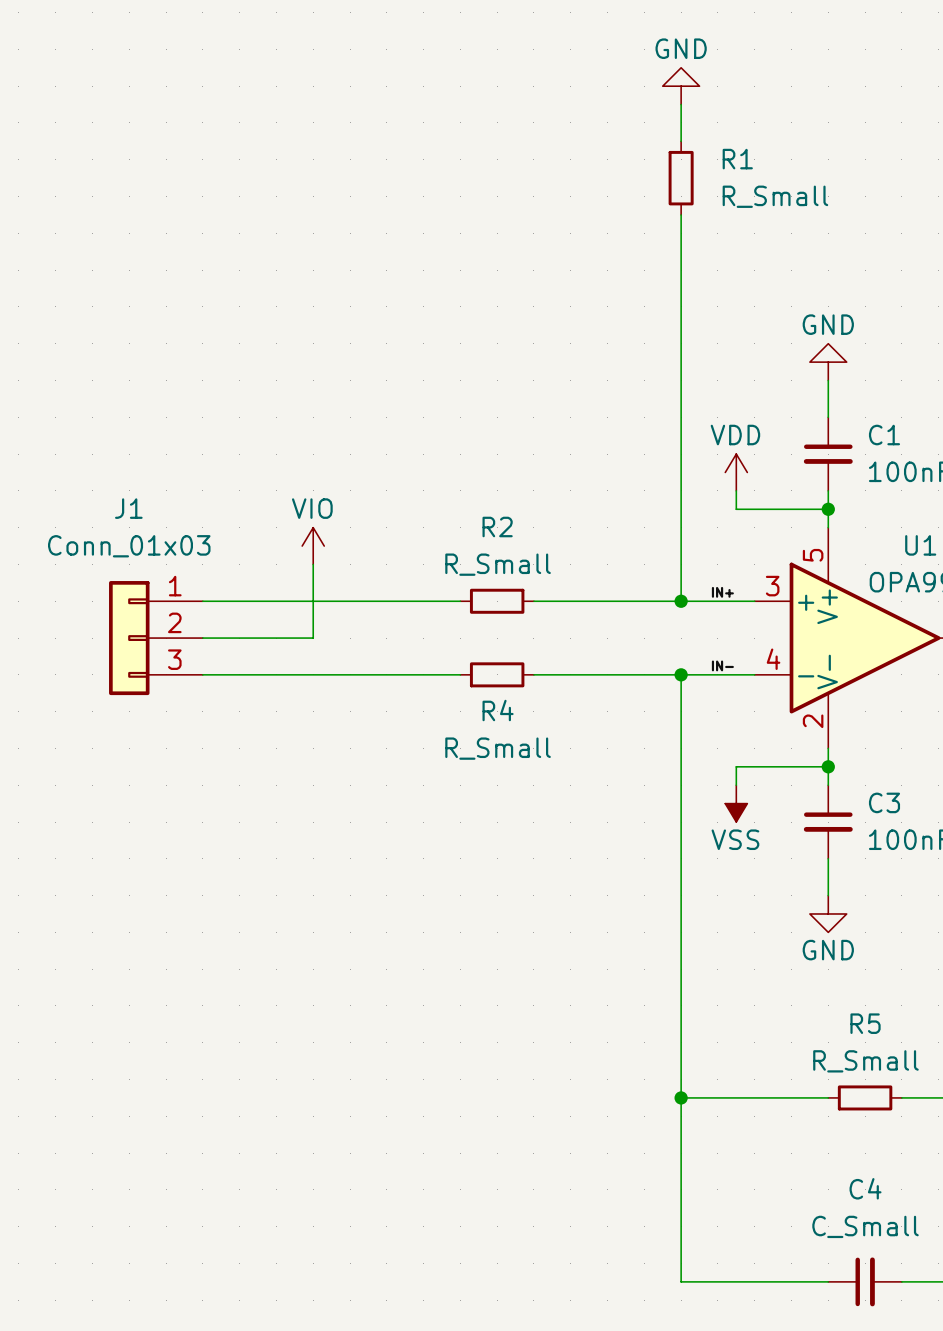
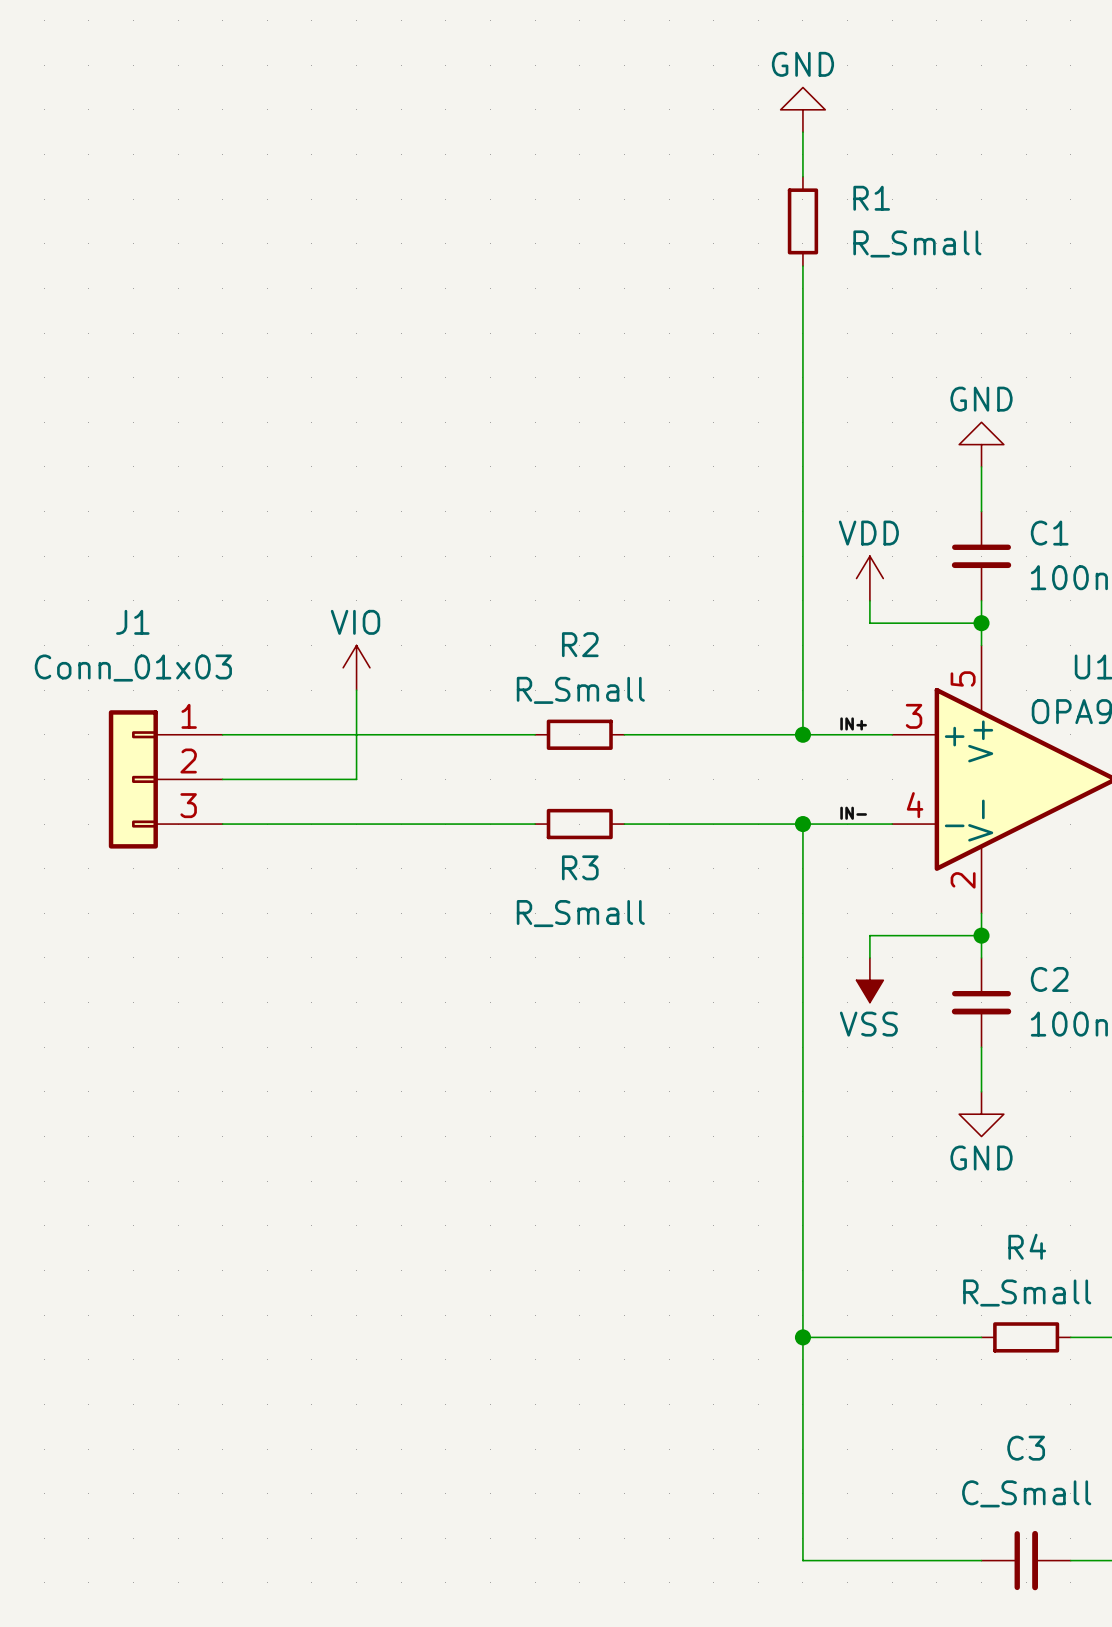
R4 name: R4 (498, 710) -> R3 (580, 867)
C3 name: C3 (884, 802) -> C2 (1049, 979)
R5 name: R5 (865, 1023) -> R4 (1027, 1246)
C4 name: C4 (865, 1188) -> C3 (1026, 1448)

